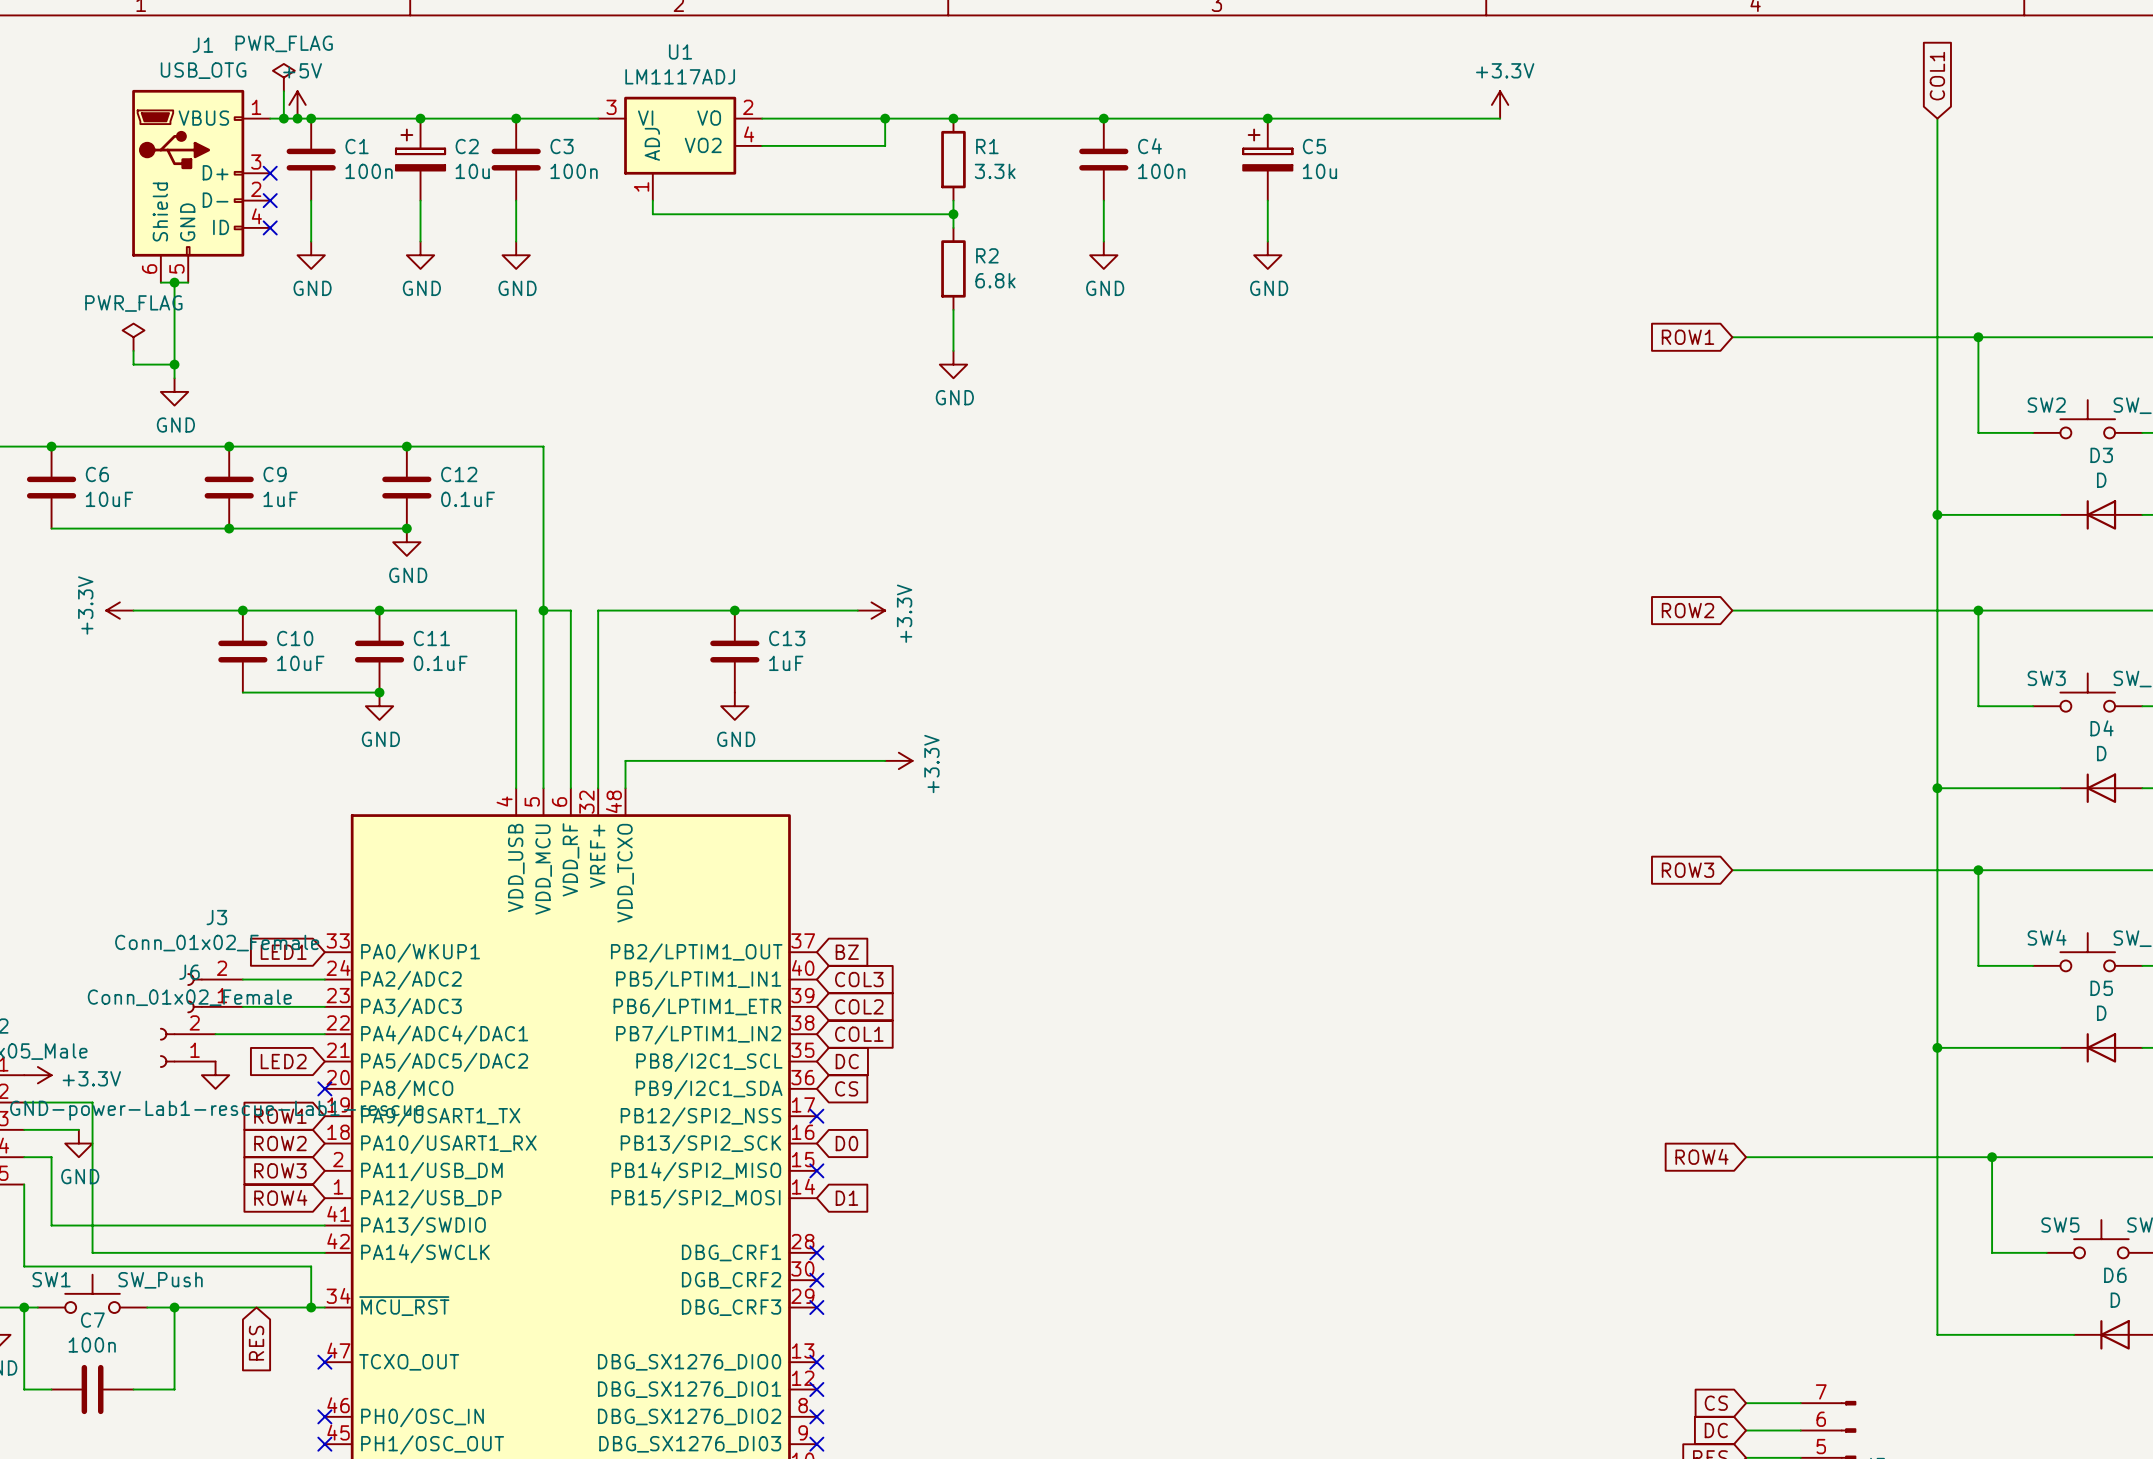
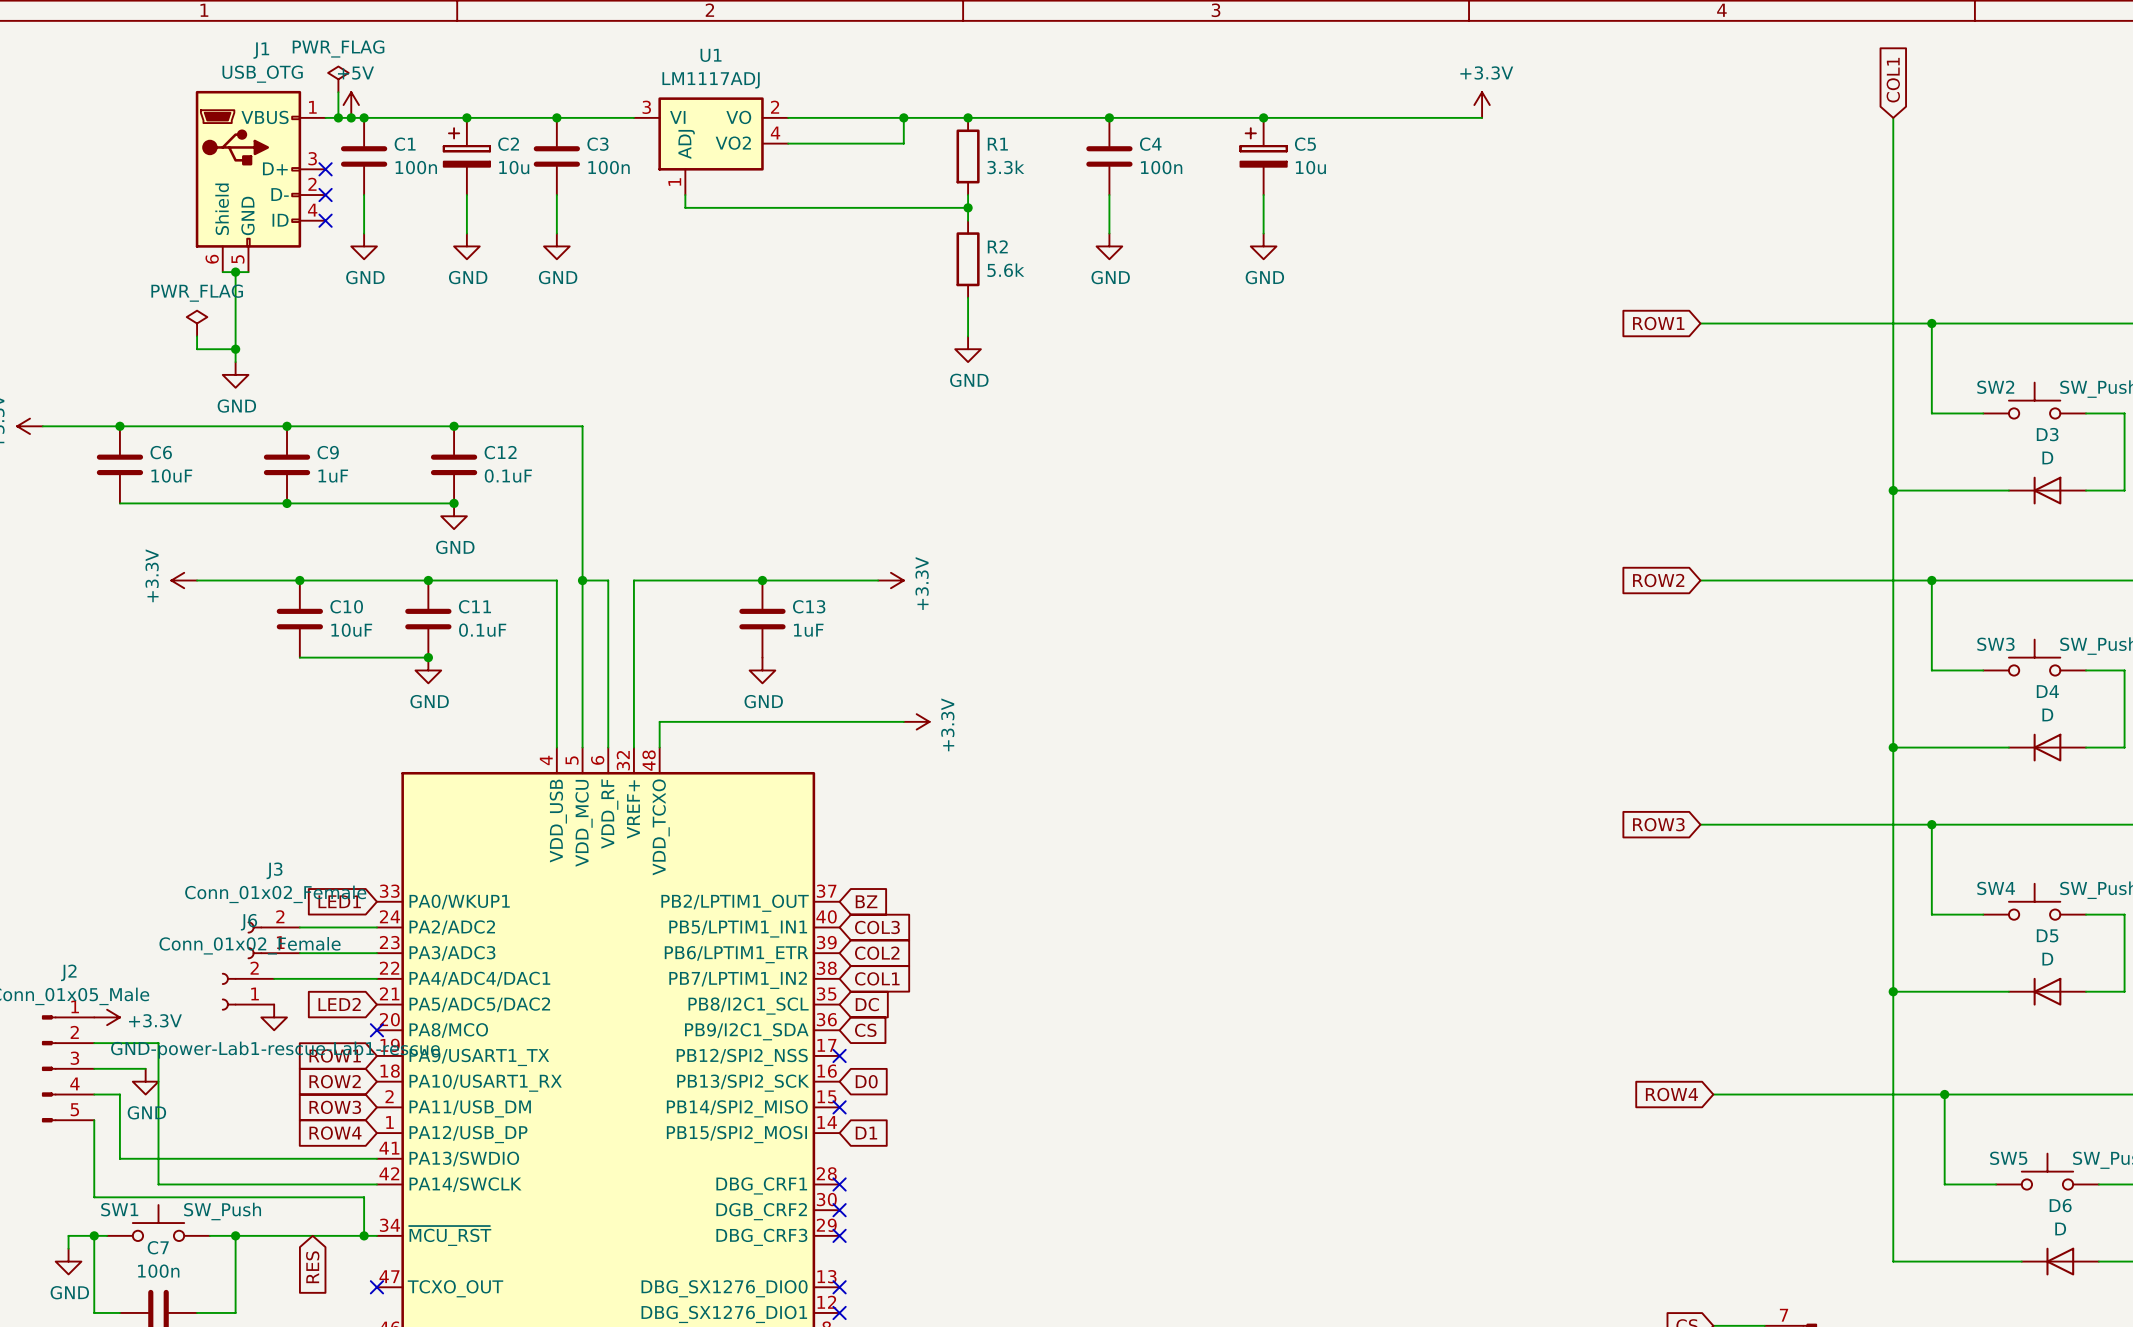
R2 value: 6.8k (995, 280) -> 5.6k (1005, 270)

